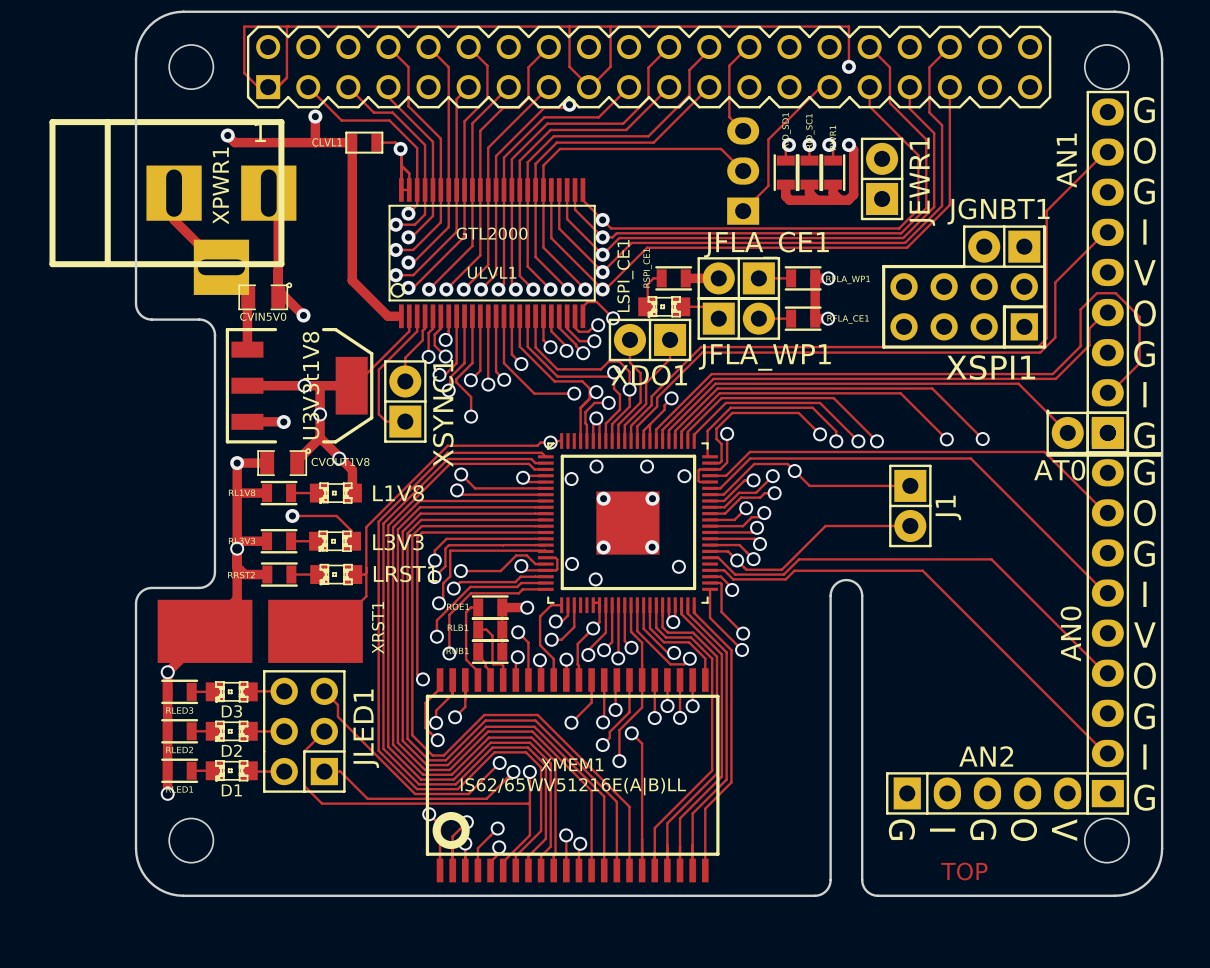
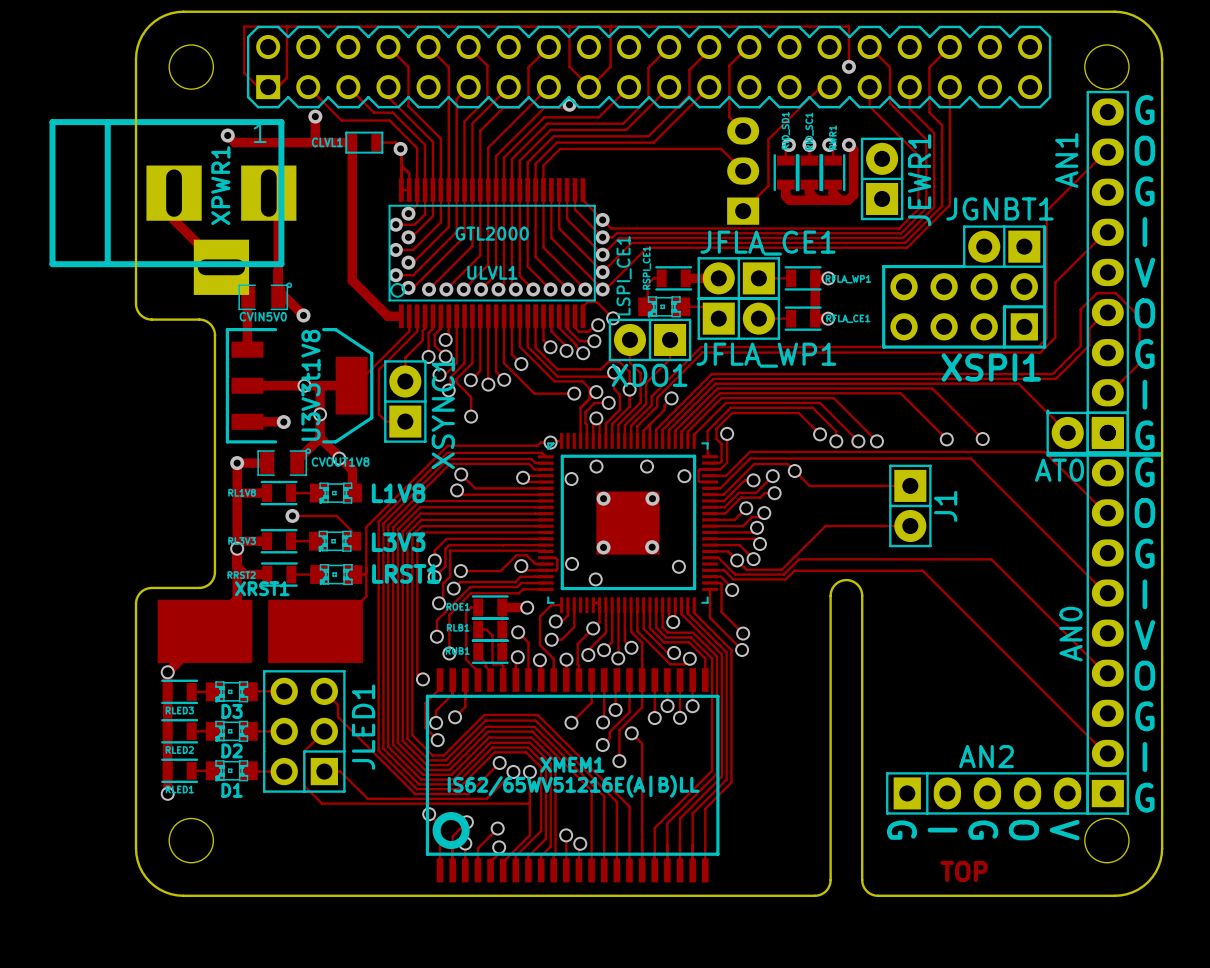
XRST1 name rotation: 0° (378, 627) -> 90° clockwise (262, 588)
XRST1 name position: XRST1 (378, 627) -> XRST1 (262, 588)

